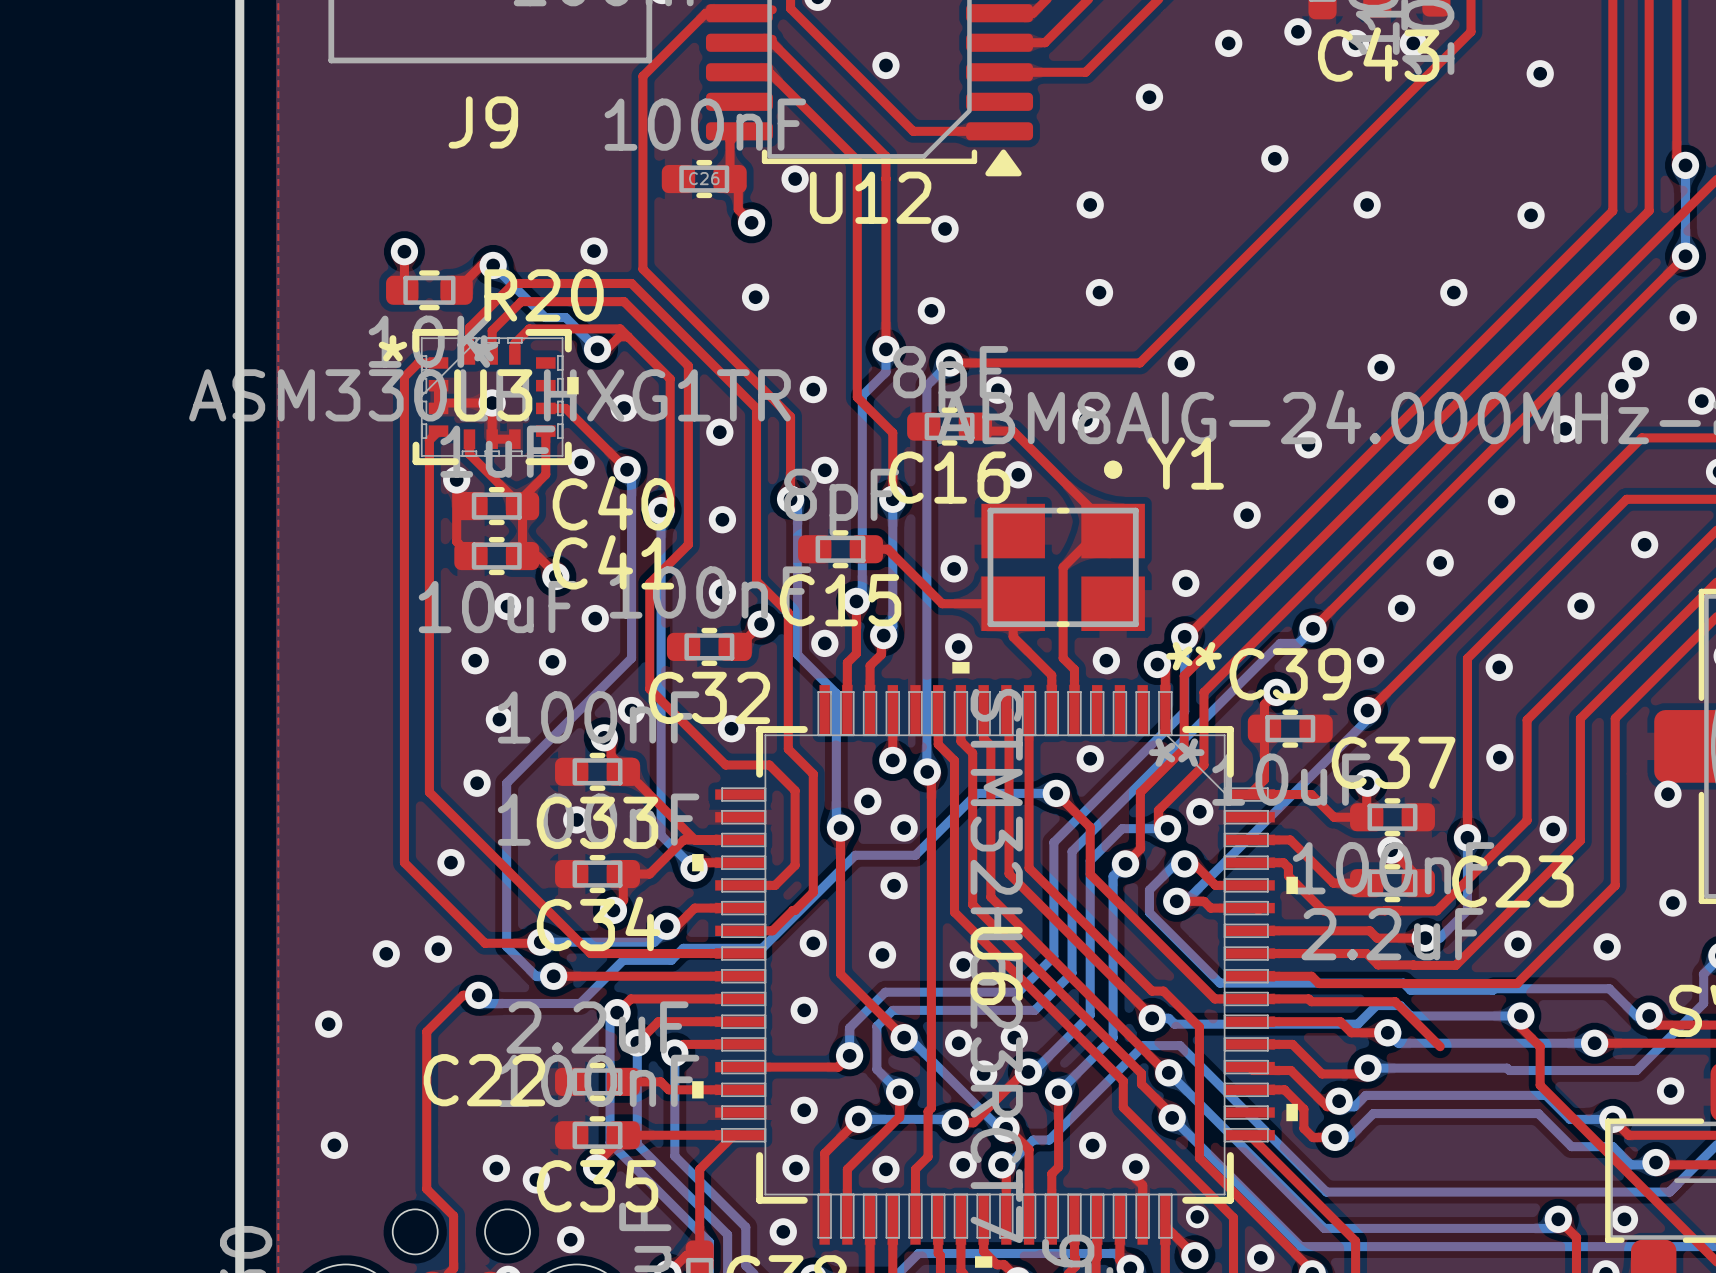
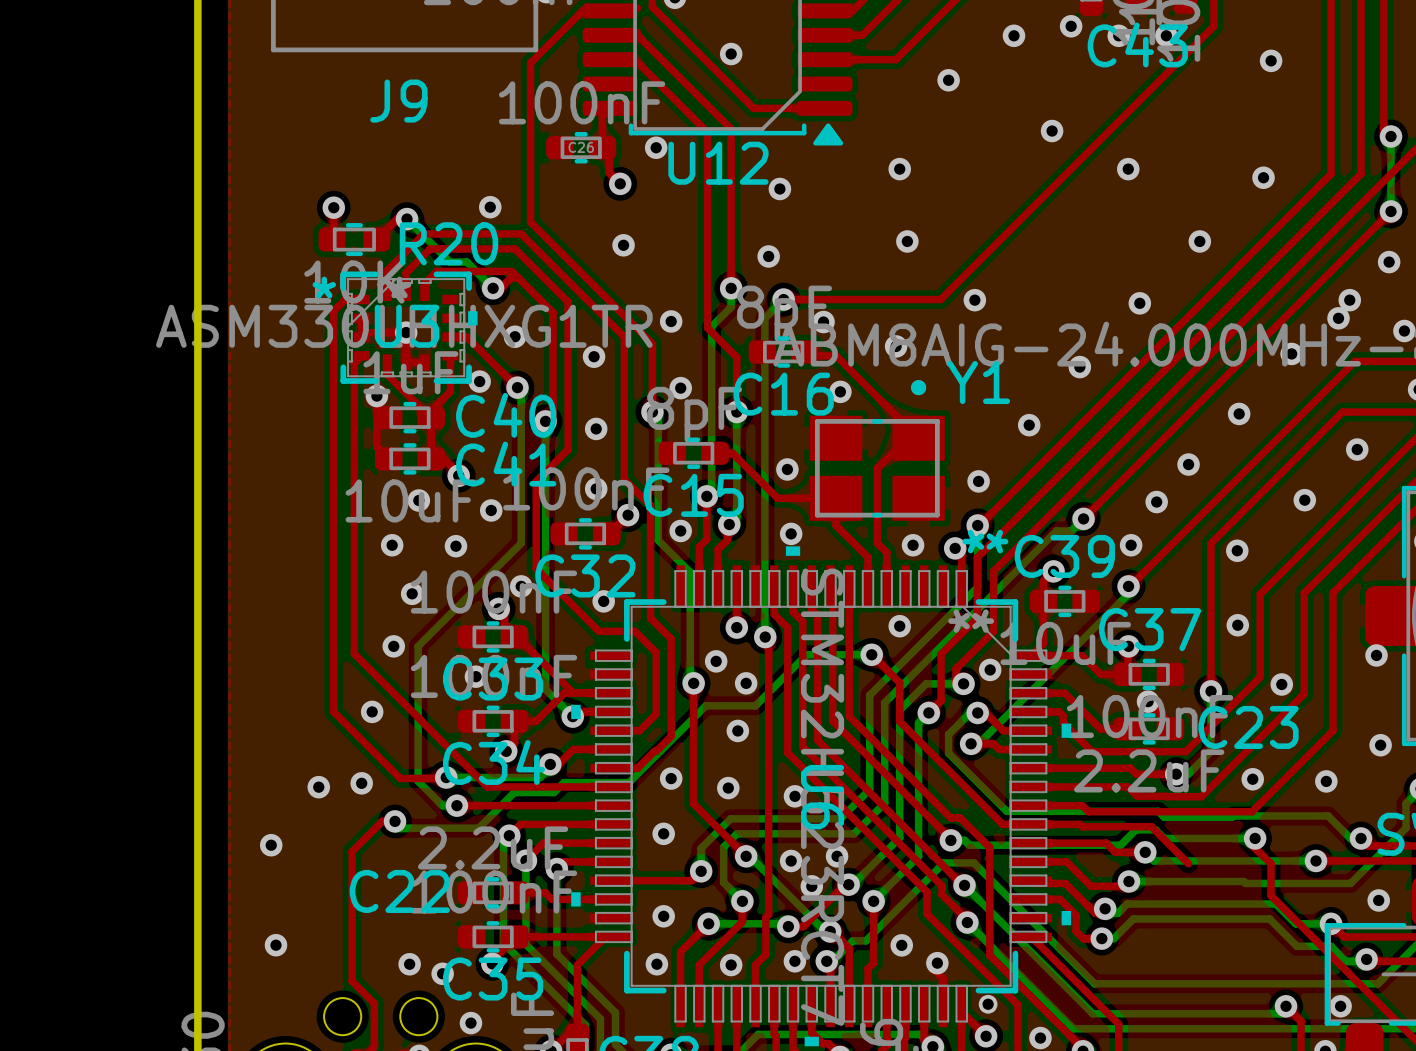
via: (783, 1231) -> none

